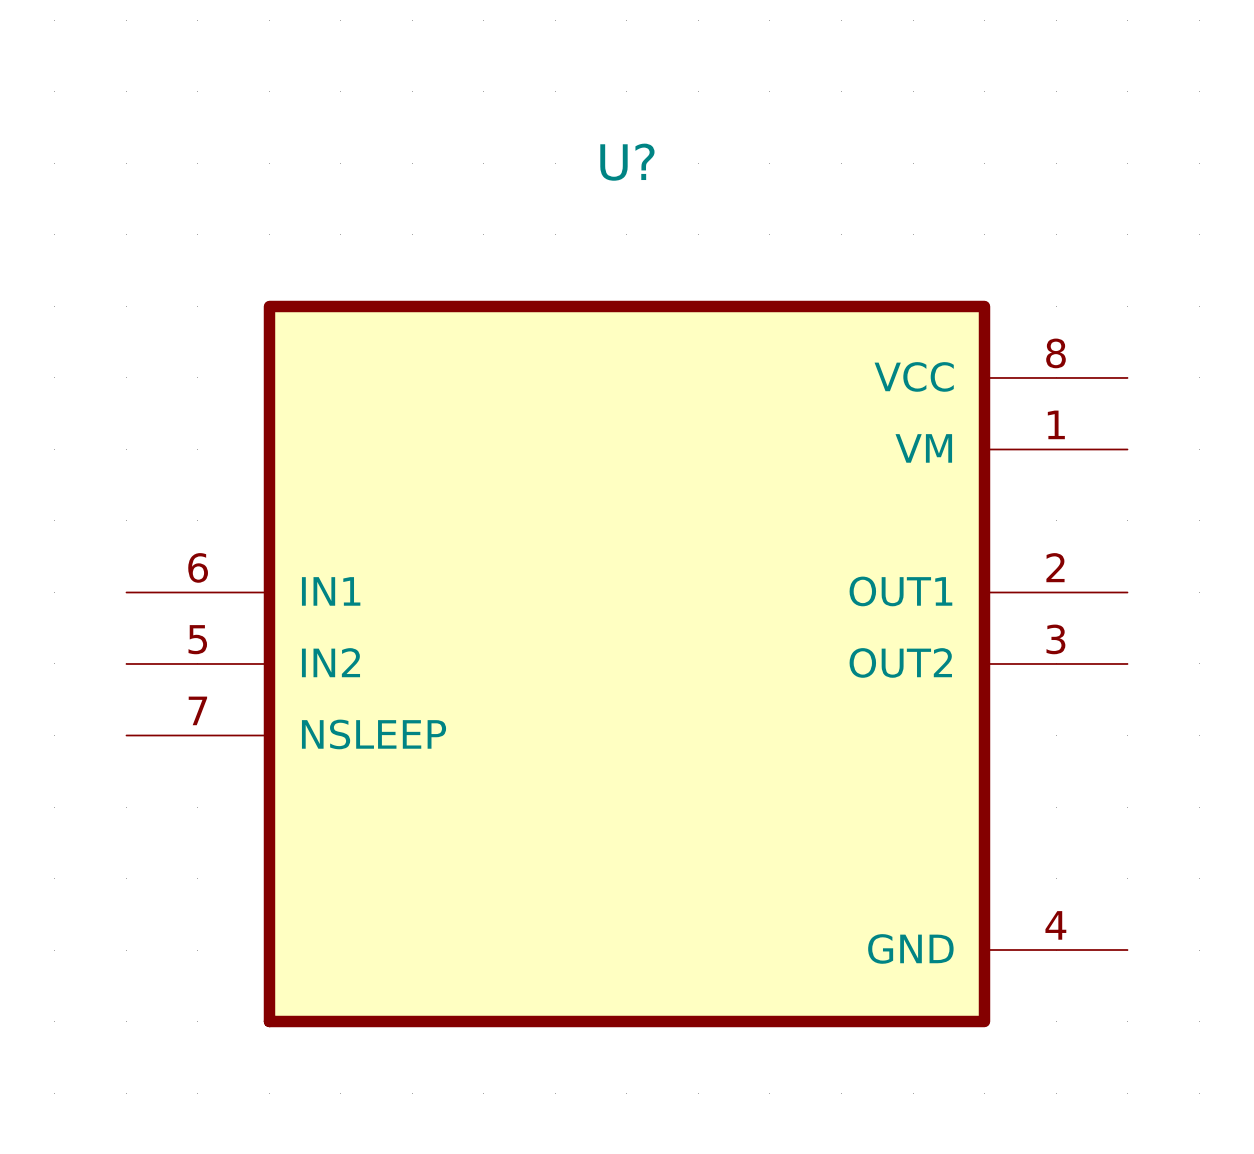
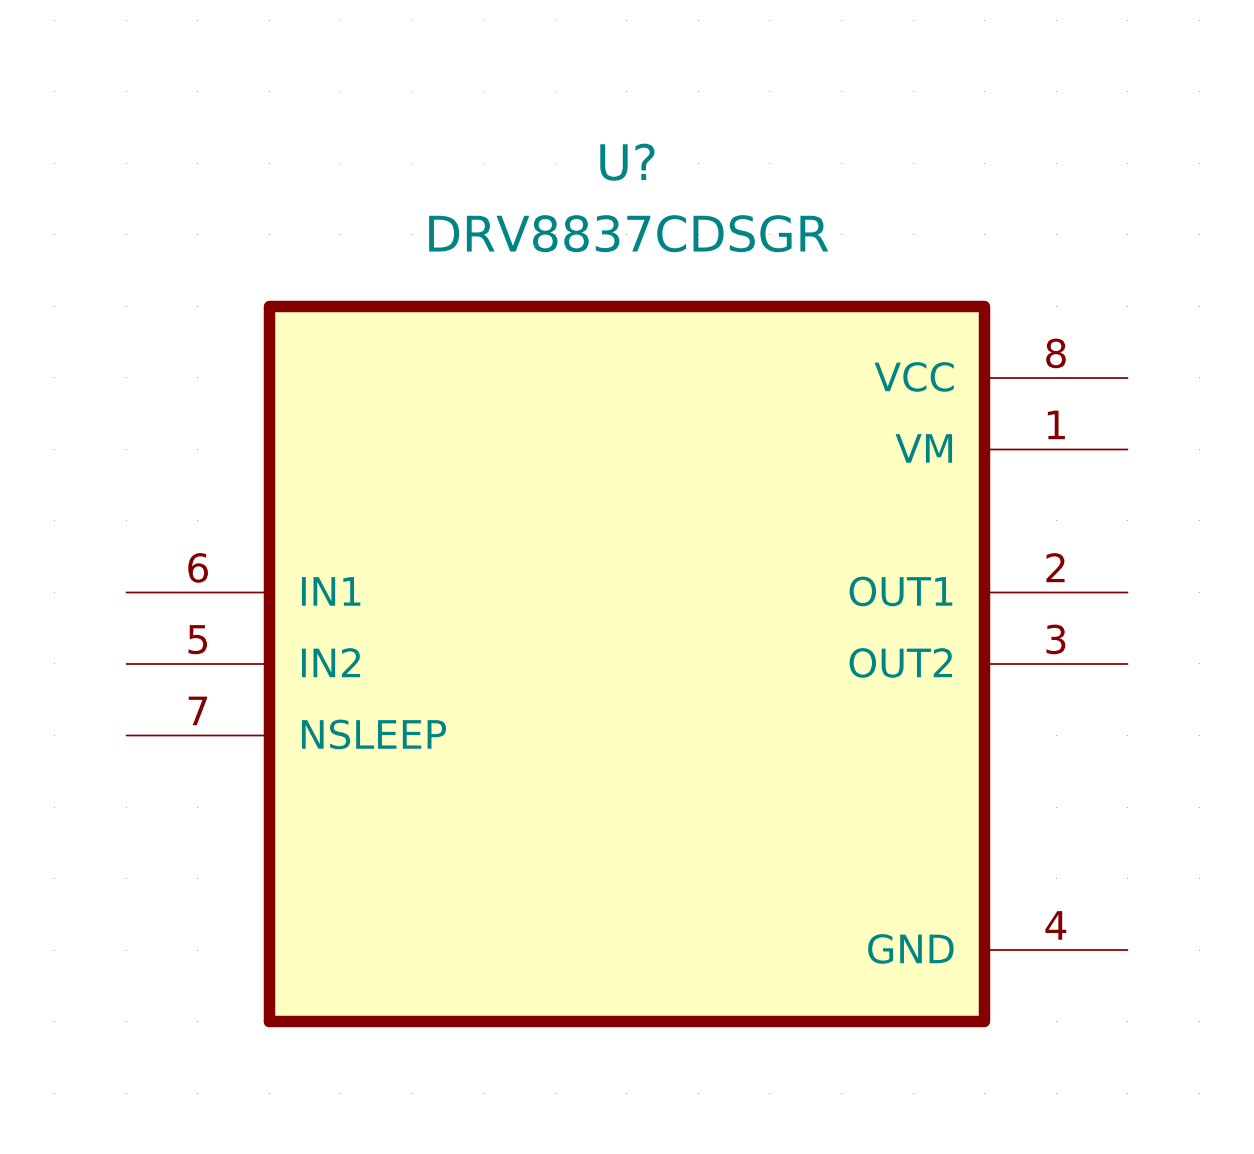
U? value: none -> DRV8837CDSGR (628, 233)

